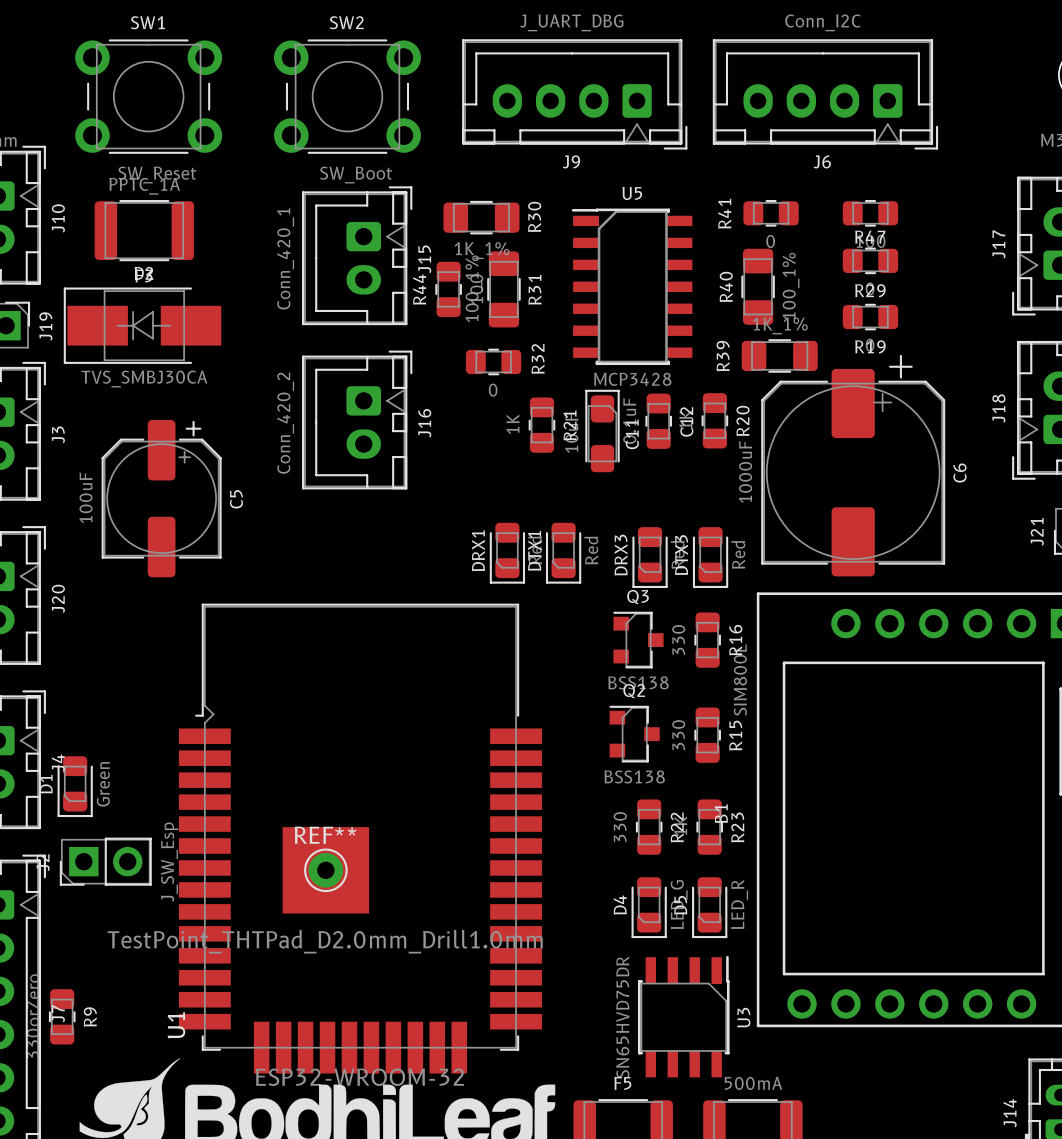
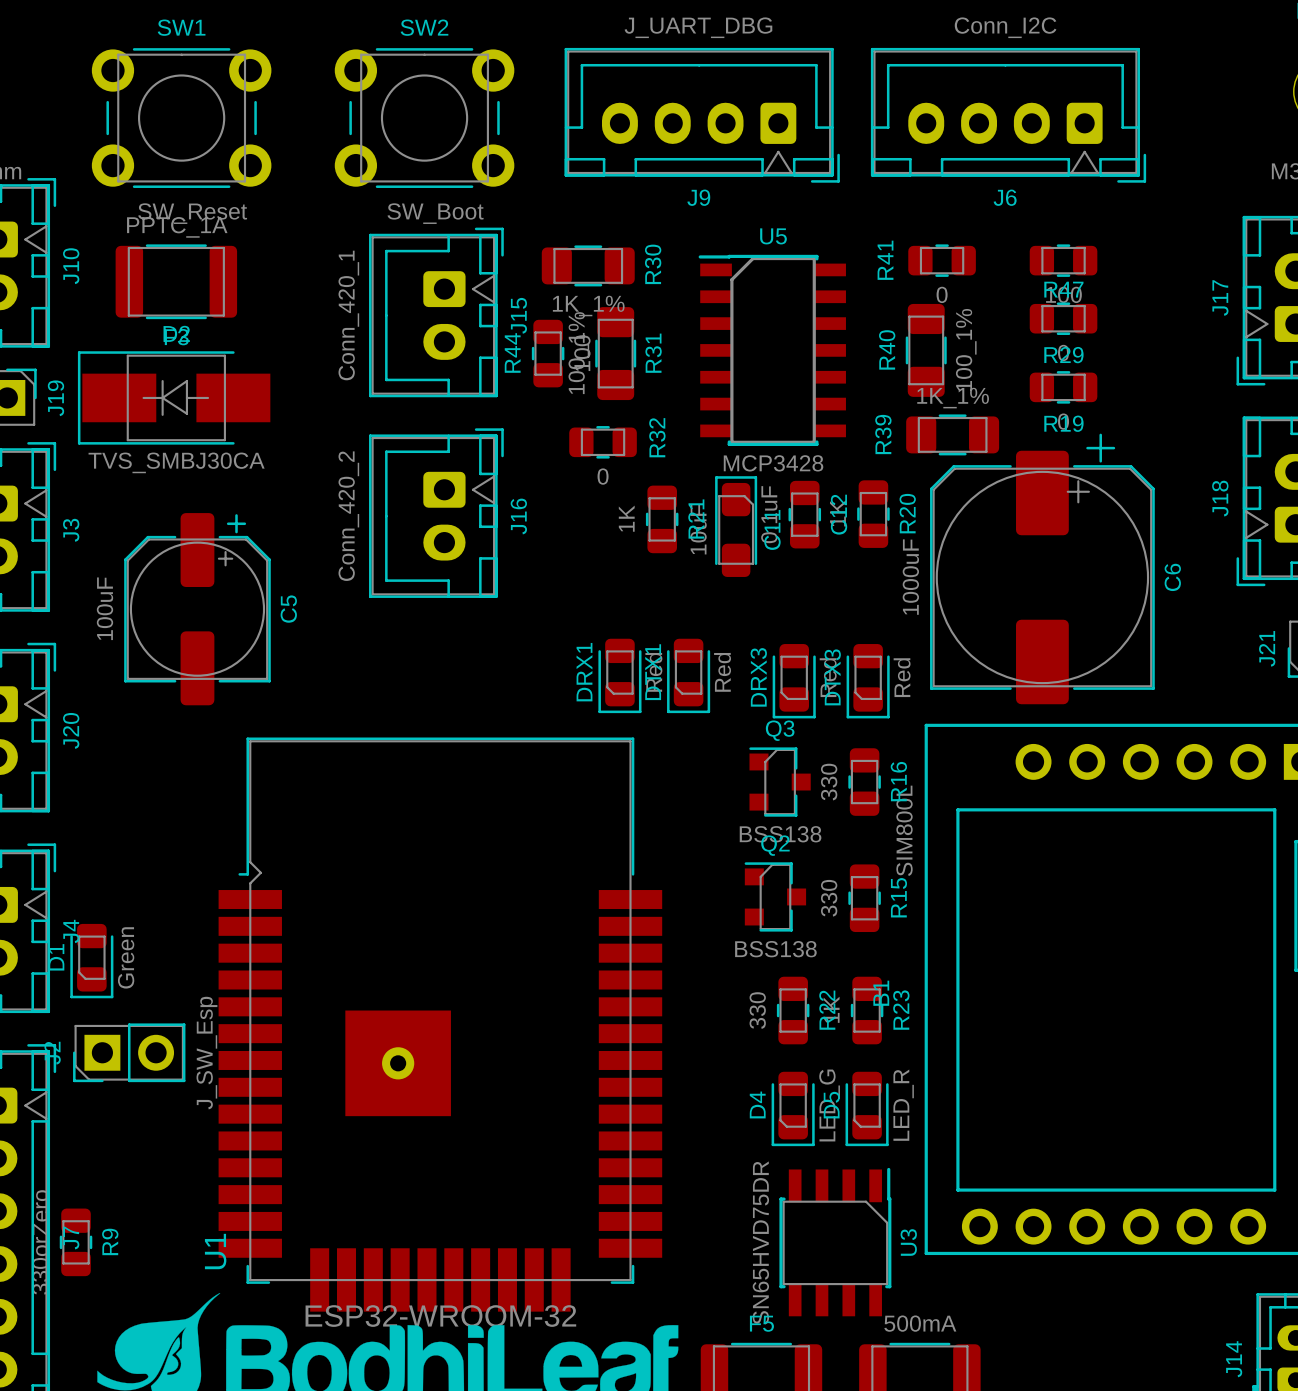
U1 footprint: [178, 603, 542, 1074] -> [218, 737, 663, 1312]
REF**: TestPoint_THTPad_D2.0mm_Drill1.0mm (325, 870) -> none

